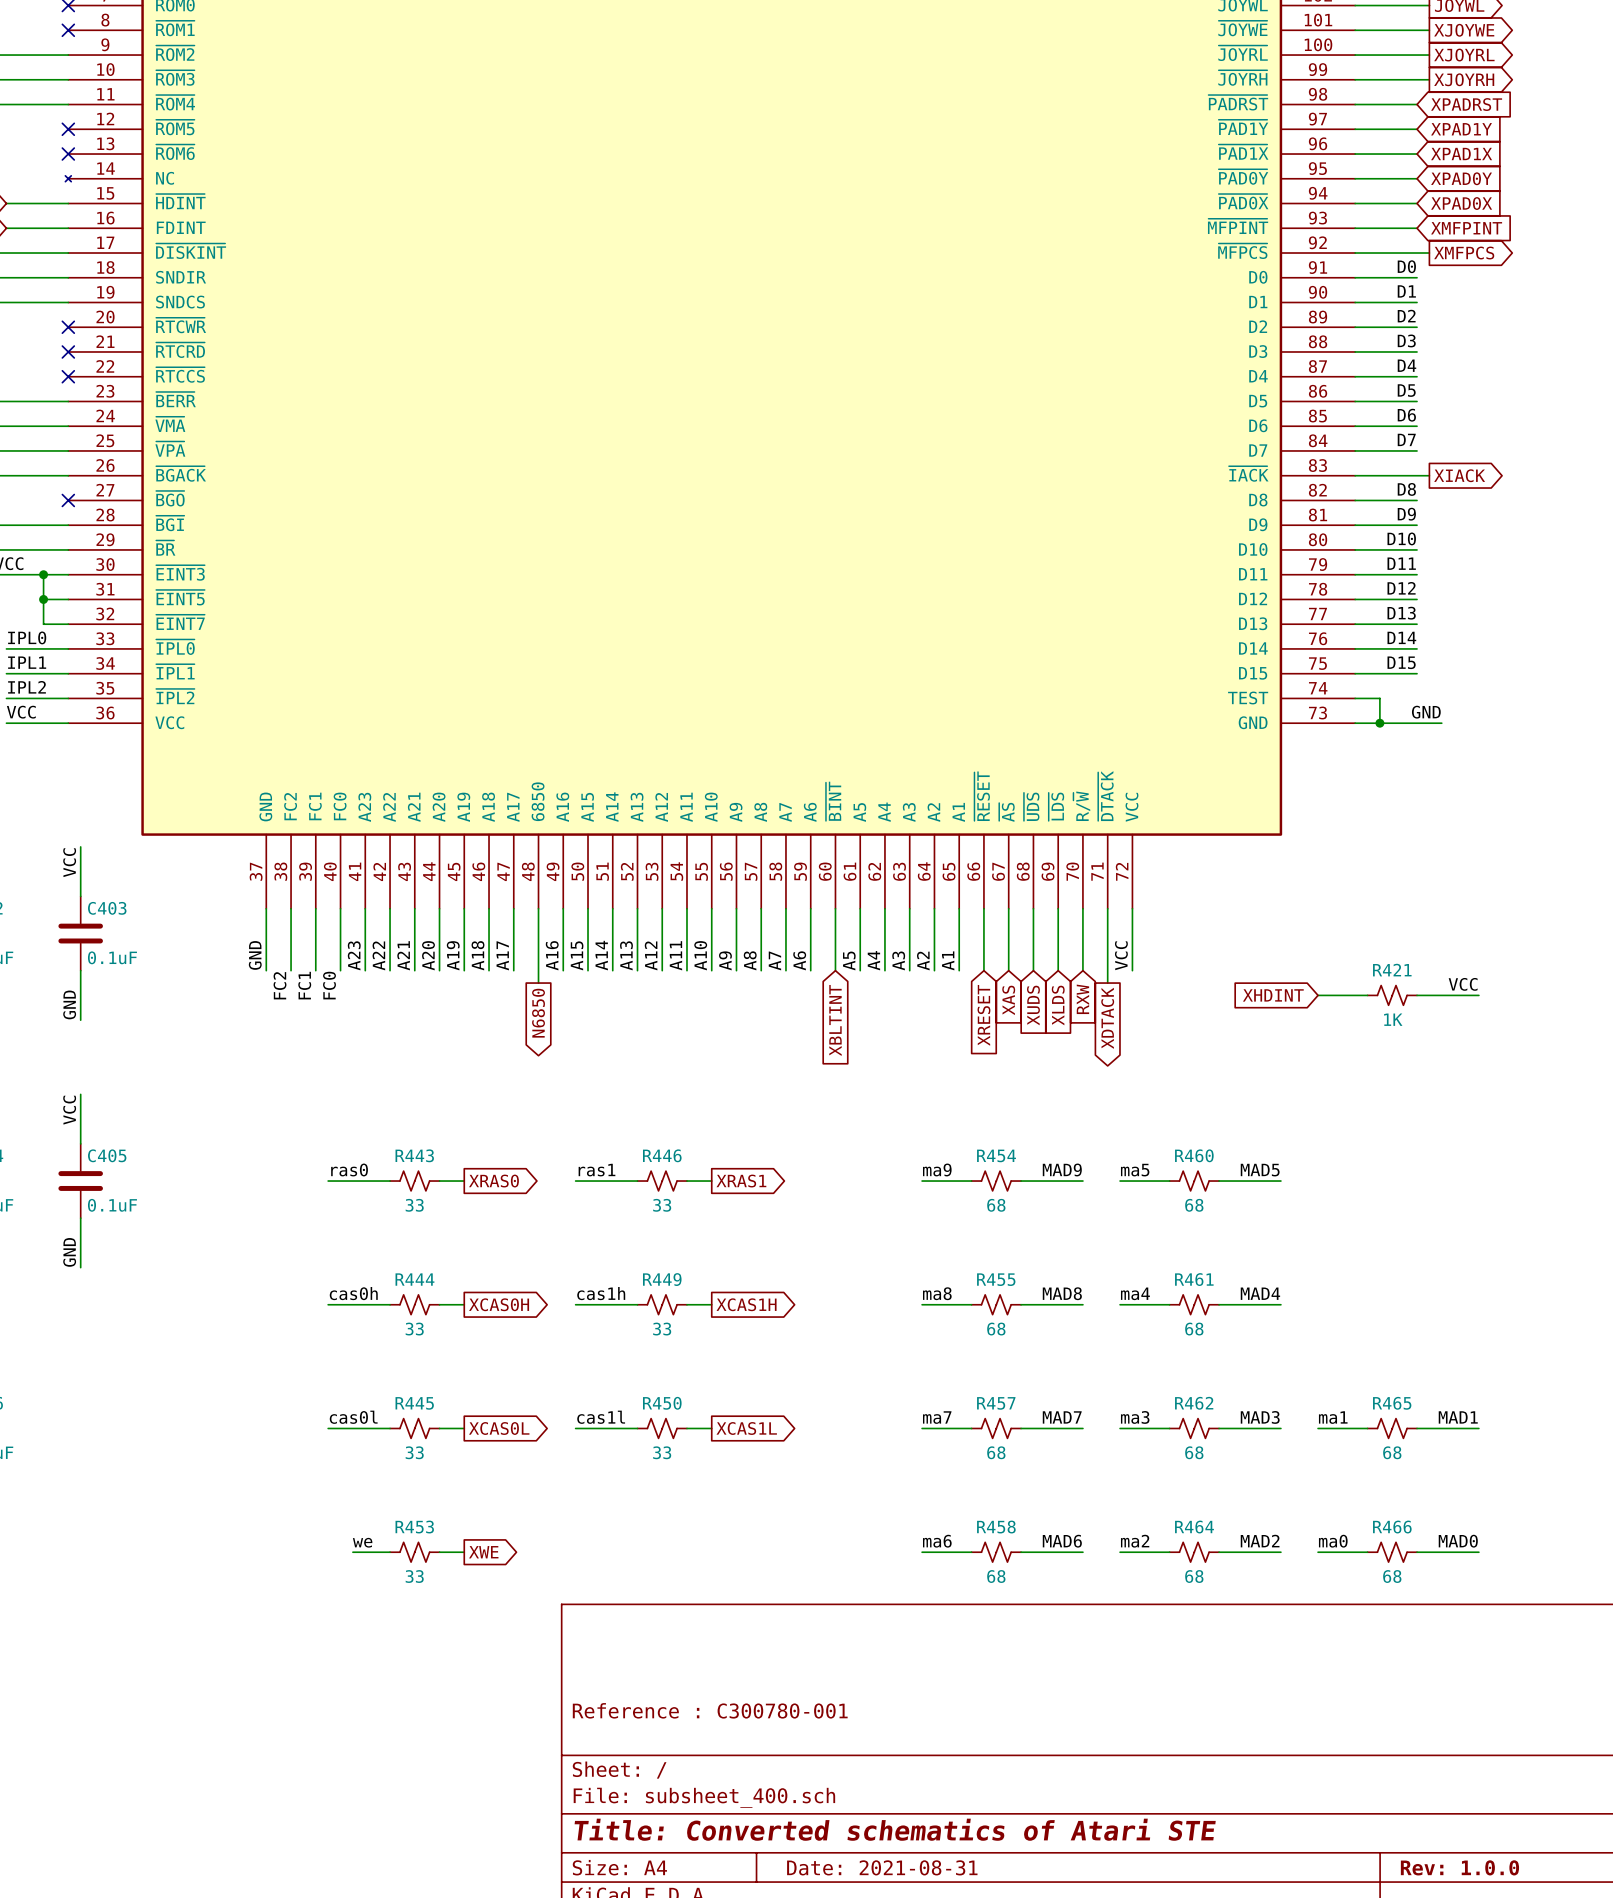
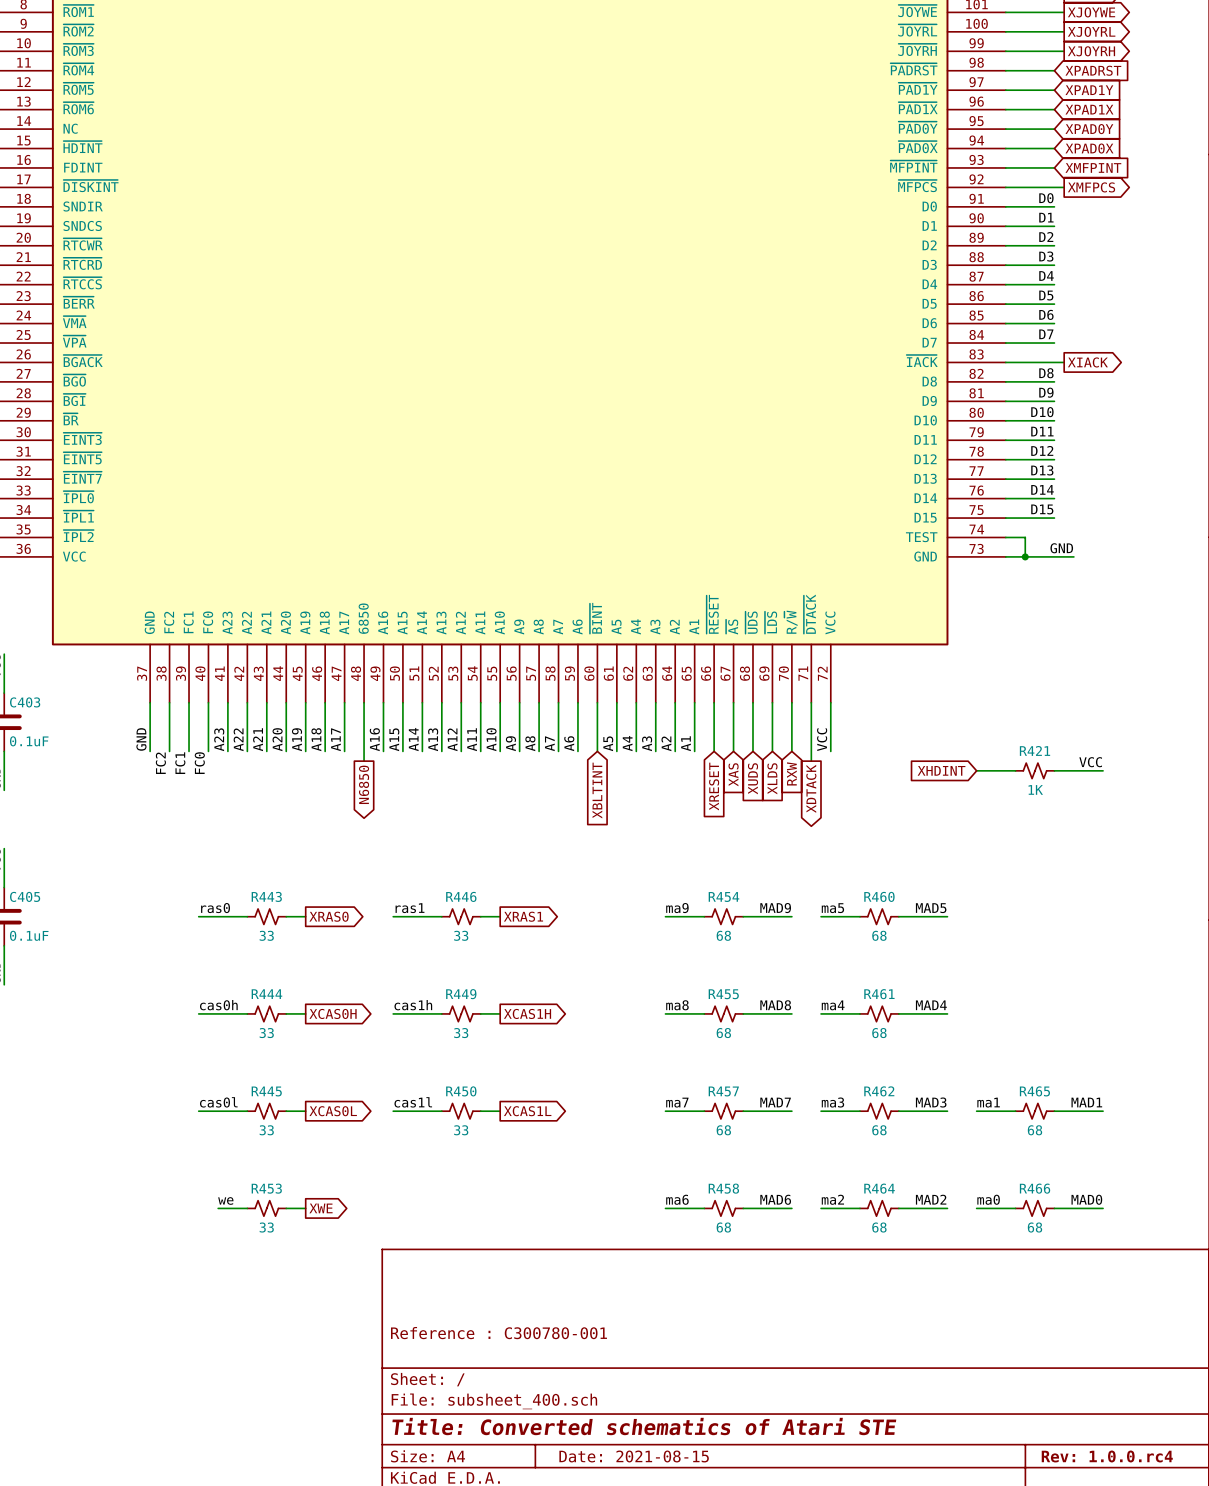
title block: Date: 2021-08-31 (882, 1867) -> Date: 2021-08-15 (634, 1456)
title block: Rev: 1.0.0 (1459, 1867) -> Rev: 1.0.0.rc4 (1107, 1456)

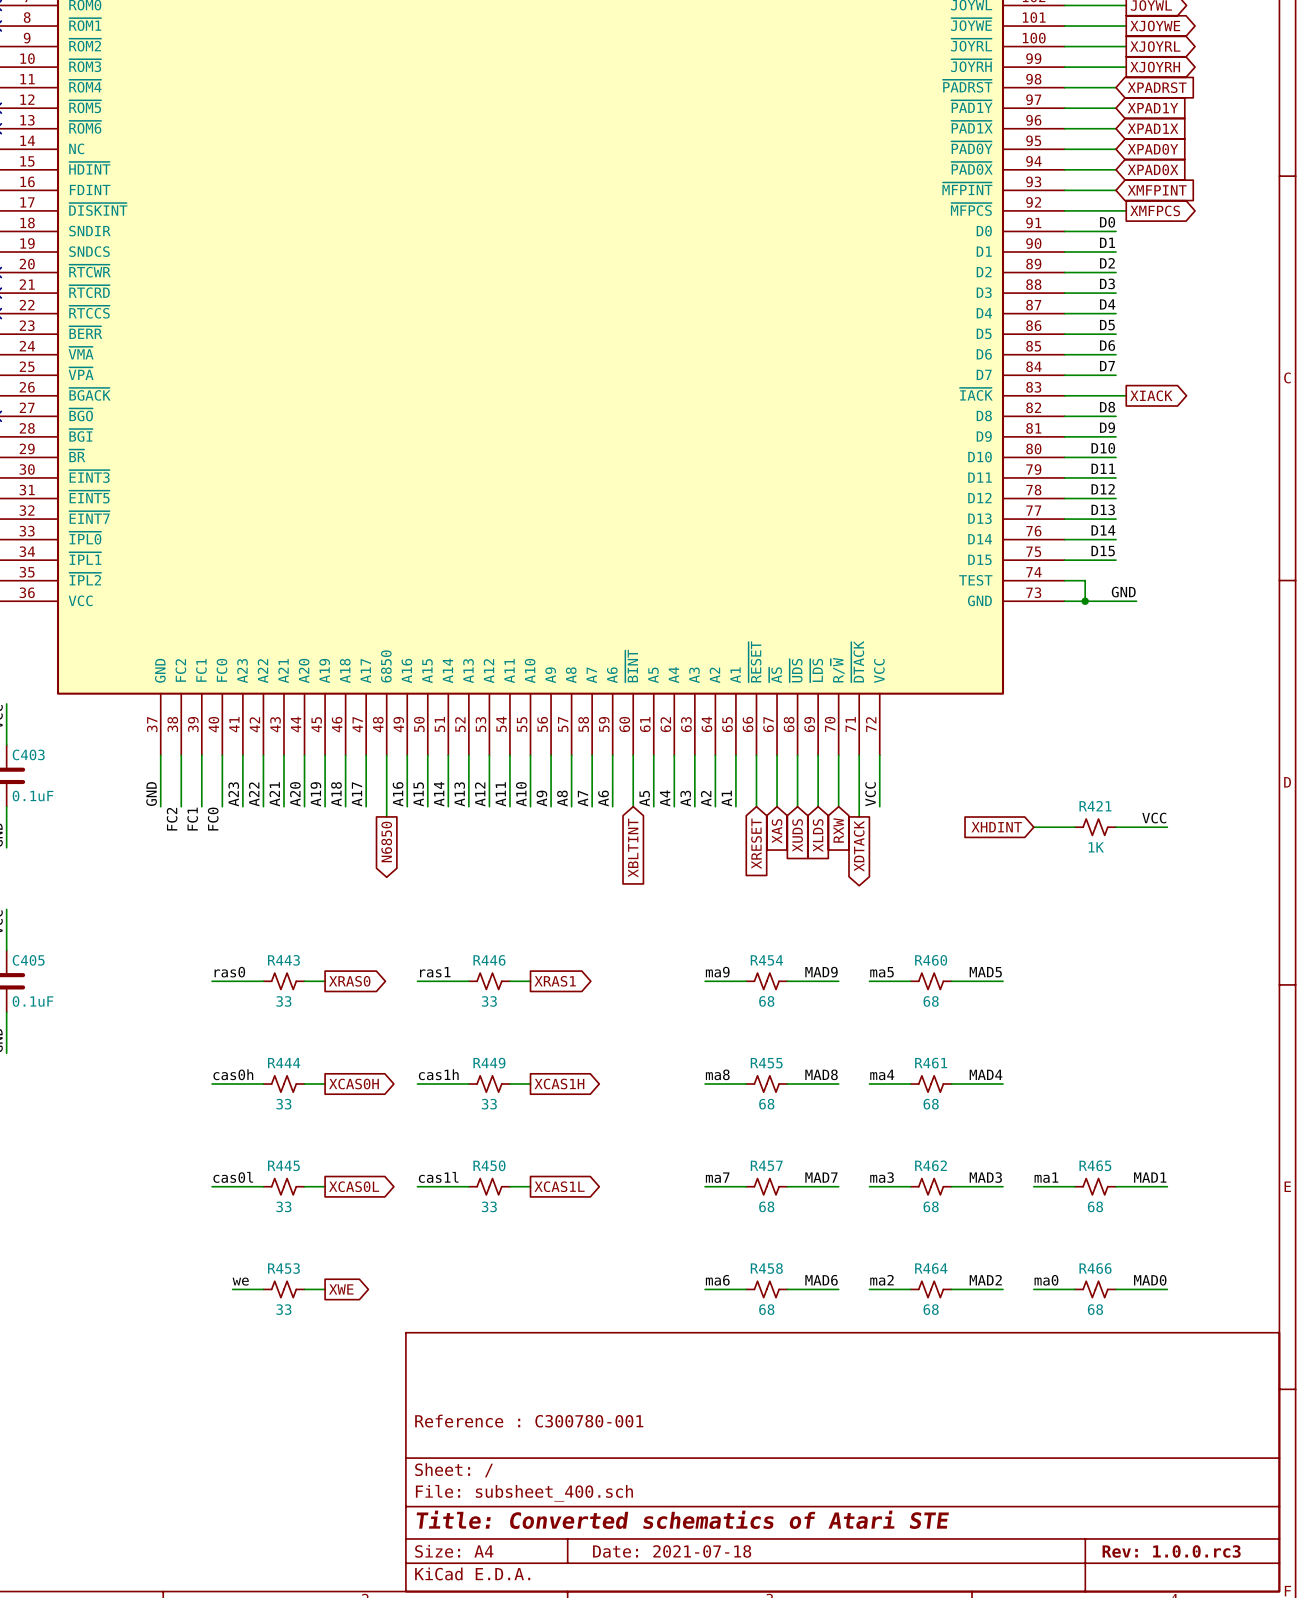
title block: Date: 2021-08-15 (634, 1456) -> Date: 2021-07-18 (672, 1551)
title block: Rev: 1.0.0.rc4 (1107, 1456) -> Rev: 1.0.0.rc3 (1171, 1551)

